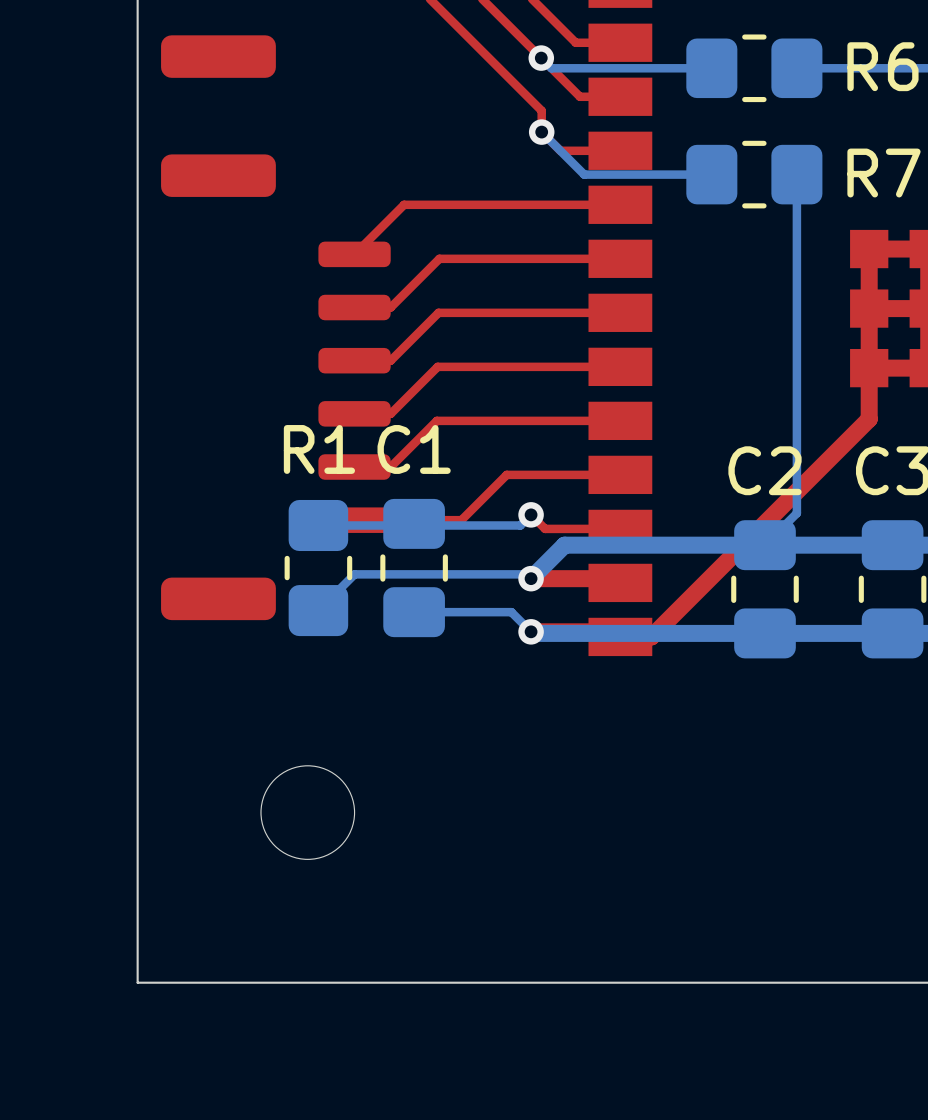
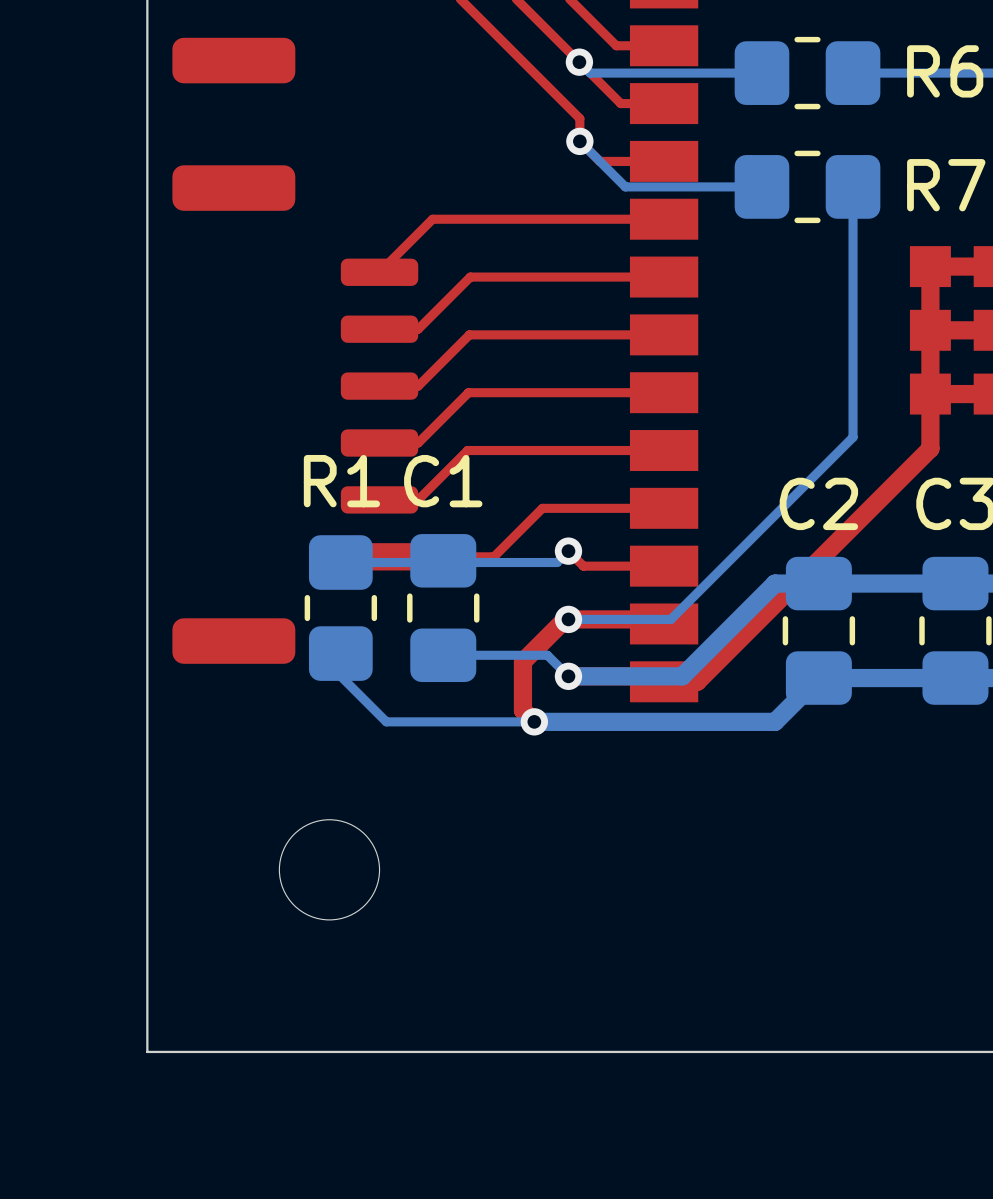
bottom track: (796, 408) (796, 513) (764, 545) -> (853, 437) (670, 619) (568, 619)
bottom track: (724, 545) (564, 545) (531, 578) (526, 574) (354, 574) (318, 610) -> (818, 678) (775, 721) (386, 721) (340, 676) (340, 653)
top track: none -> (565, 618) (522, 661) (522, 710) (534, 721)
bottom track: (531, 631) (532, 633) (764, 633) -> (568, 676) (682, 676) (775, 583)
via: none -> (534, 721)

